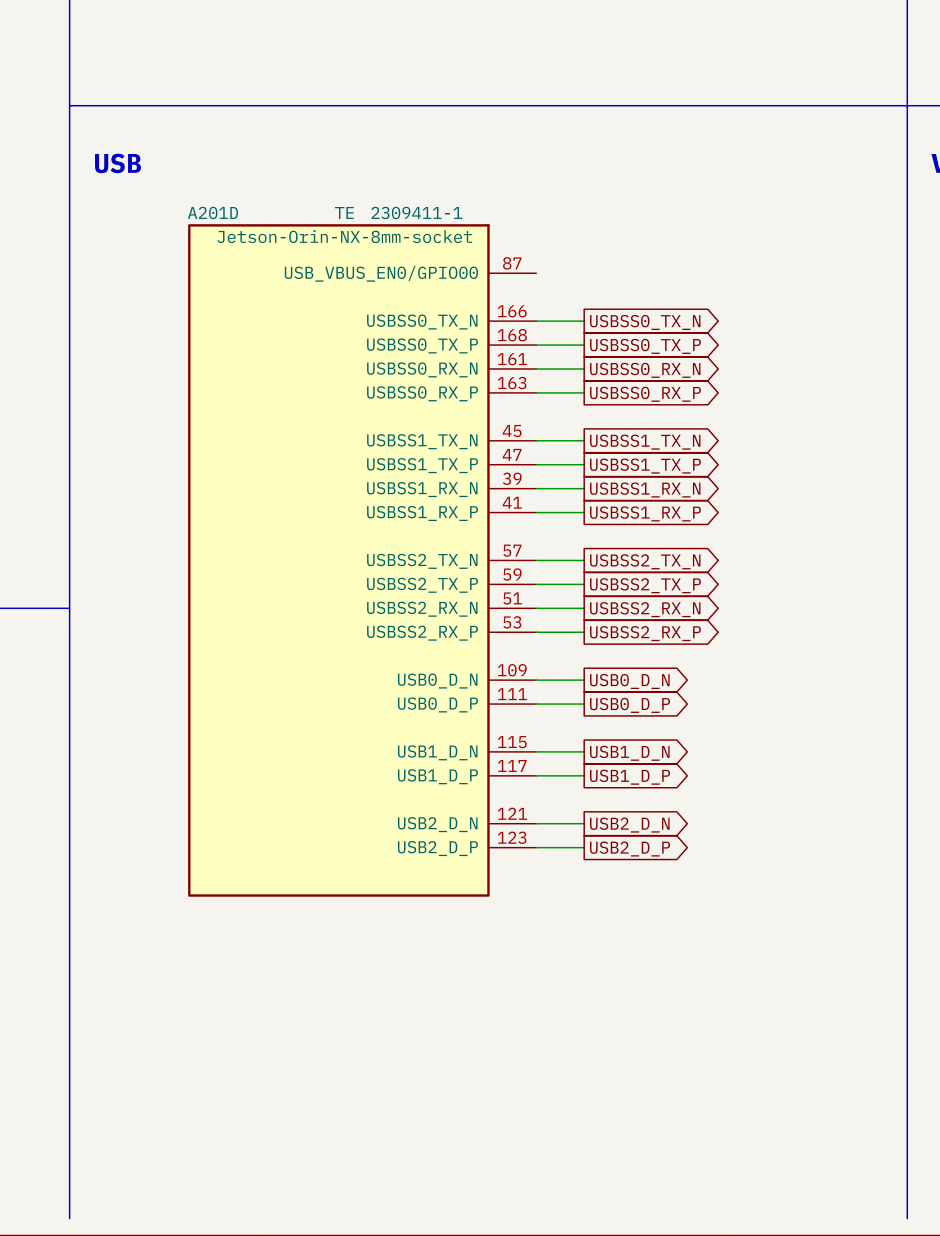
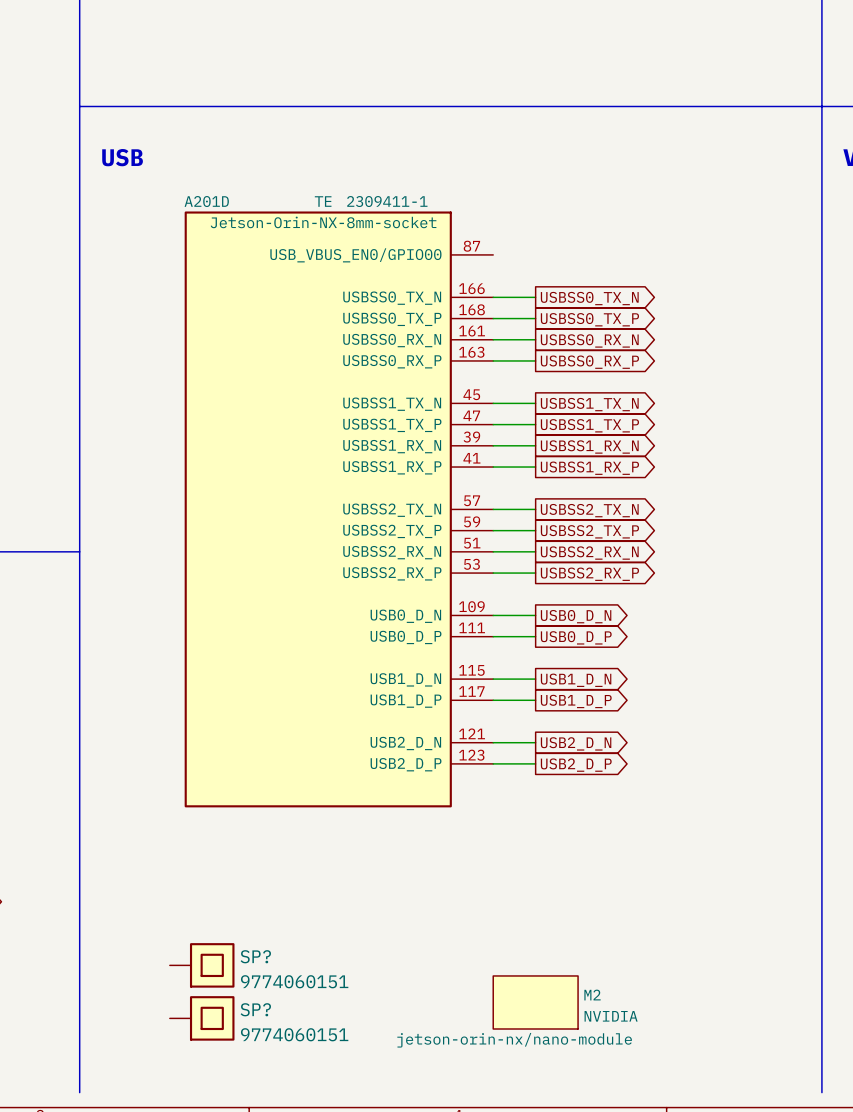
SP?: none -> 9774060151 (202, 965)
M2: none -> jetson-orin-nx/nano-module (535, 1002)
SP?: none -> 9774060151 (202, 1018)

